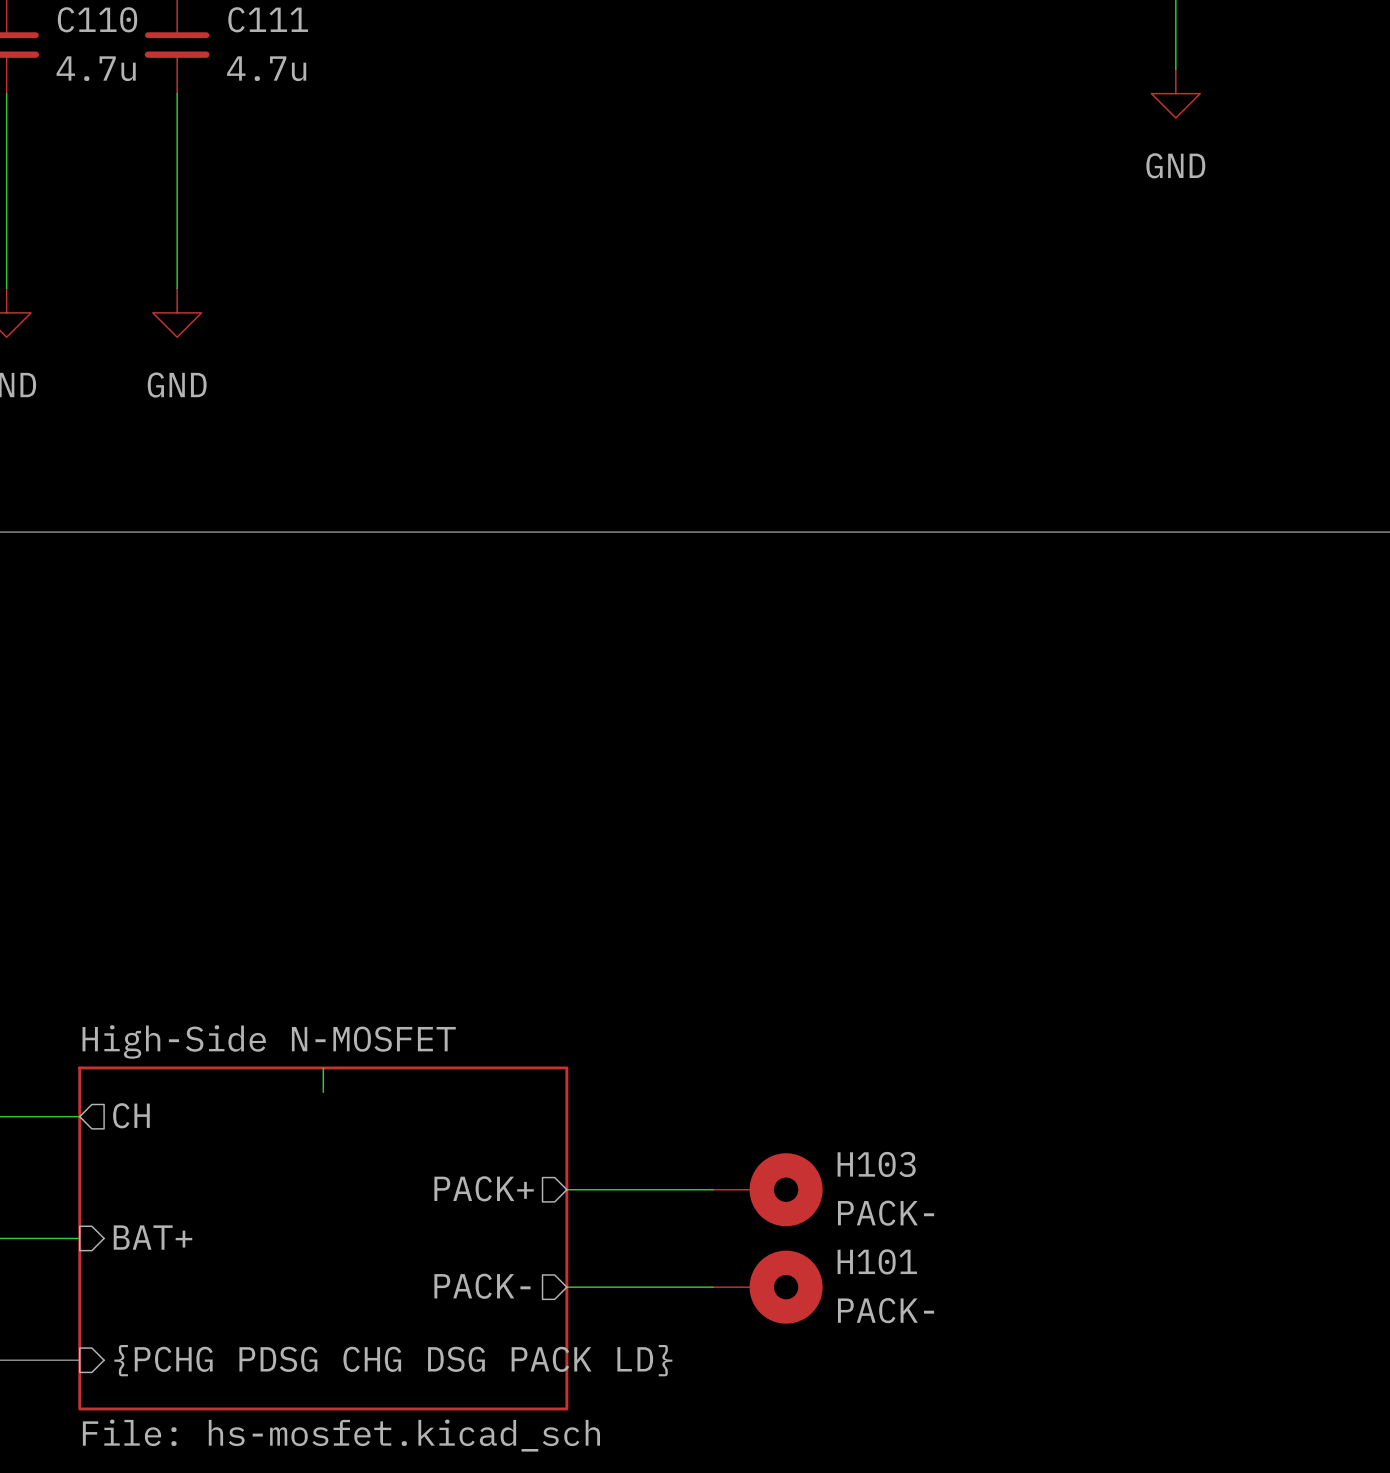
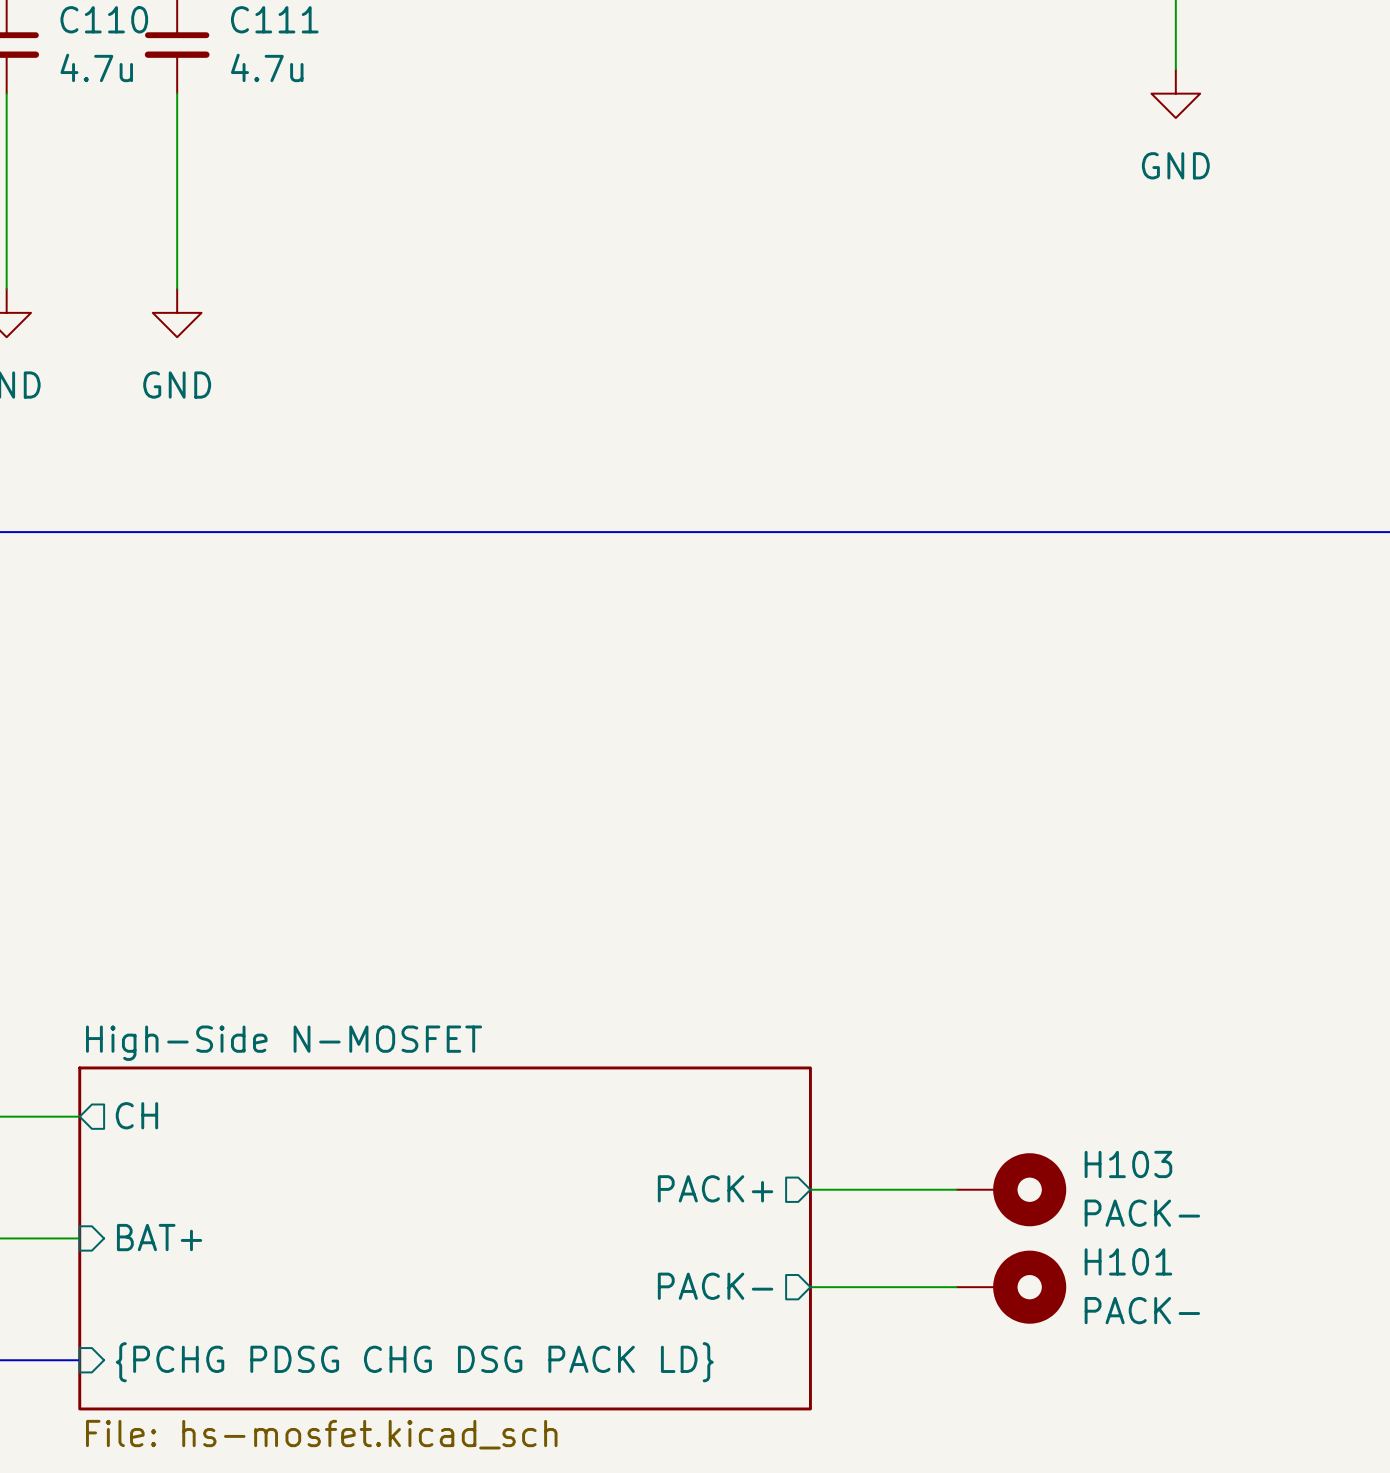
wire: (323, 1067) (323, 1092) -> none
sheet pin position: PACK+ (484, 1188) -> PACK+ (715, 1188)
wire: (566, 1189) (713, 1189) -> (810, 1189) (956, 1189)
H103 position: (767, 1189) -> (1011, 1189)
sheet High-Side N-MOSFET: File: hs-mosfet.kicad_sch (323, 1238) -> none
sheet High-Side N-MOSFET: none -> File: hs-mosfet.kicad_sch (445, 1238)
sheet pin position: PACK- (482, 1286) -> PACK- (715, 1286)
wire: (566, 1287) (713, 1287) -> (810, 1287) (956, 1287)
H101 position: (767, 1287) -> (1011, 1287)

